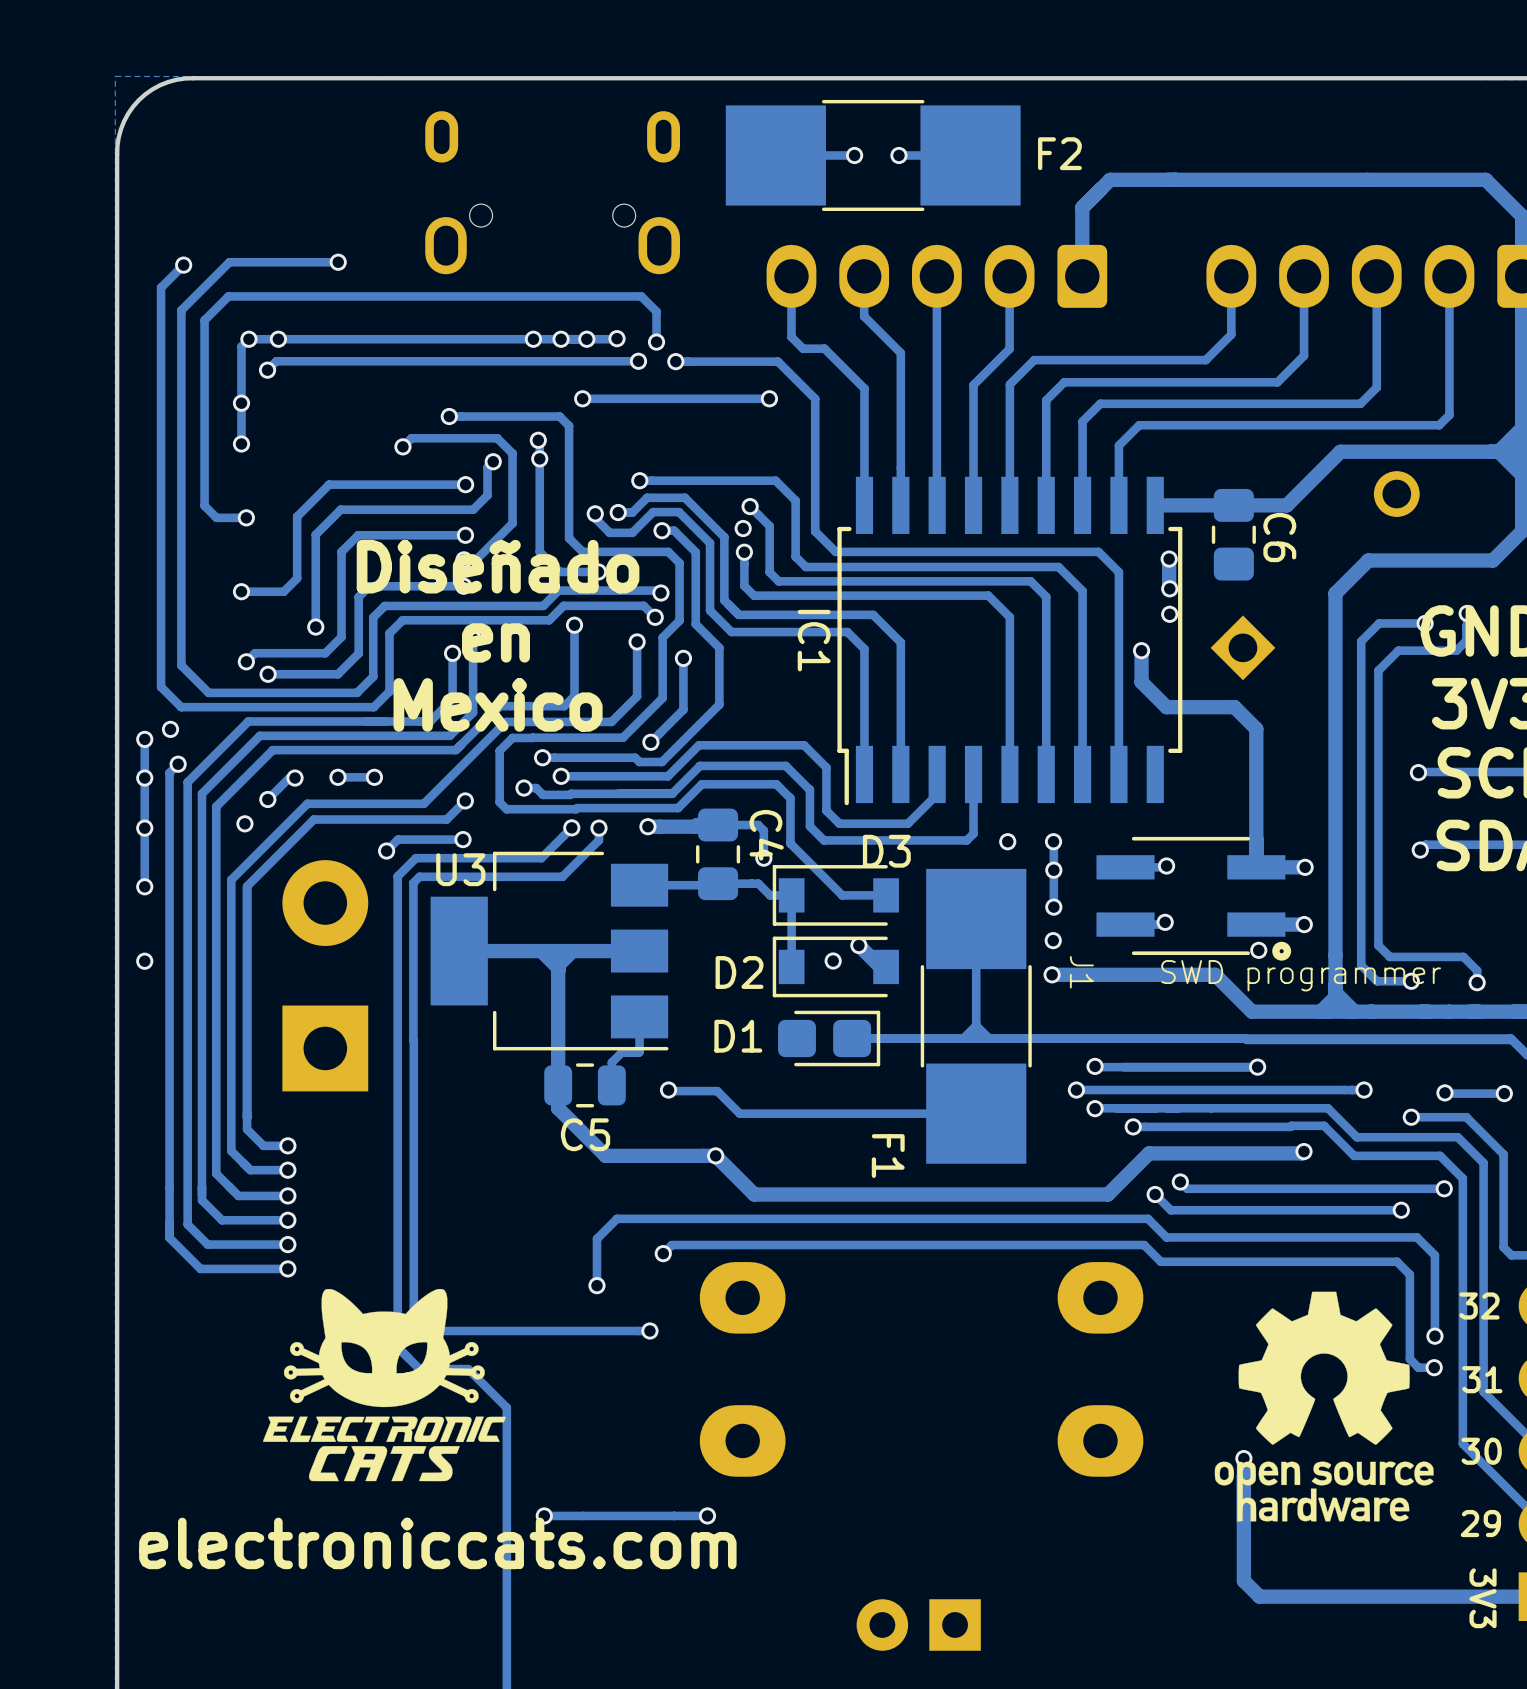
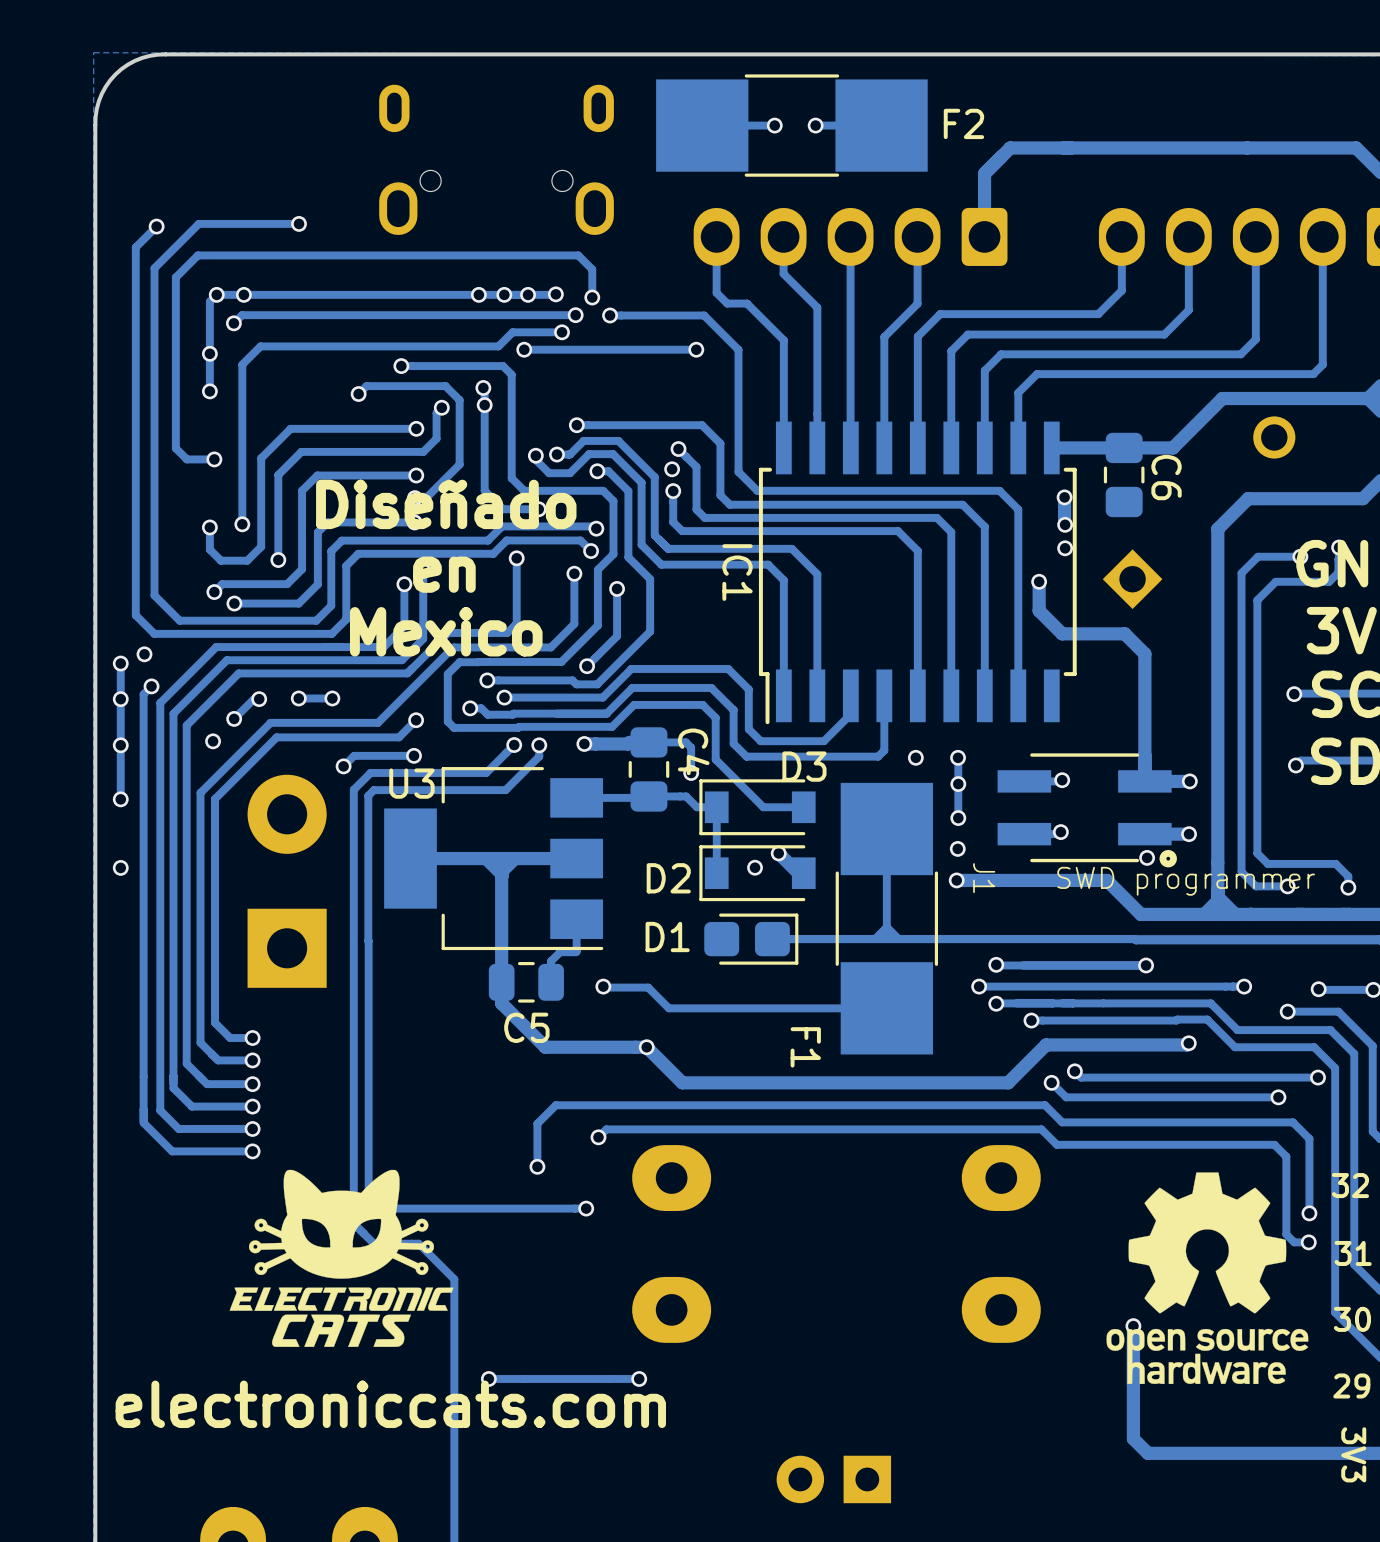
track: none -> (562, 332) (512, 332) (498, 346) (260, 346) (242, 364) (242, 524)
via: none -> (562, 332)
track: (297, 578) (283, 591) (241, 591) -> (261, 515) (261, 546) (247, 560) (220, 560) (209, 549) (209, 527)
via: none -> (242, 524)

